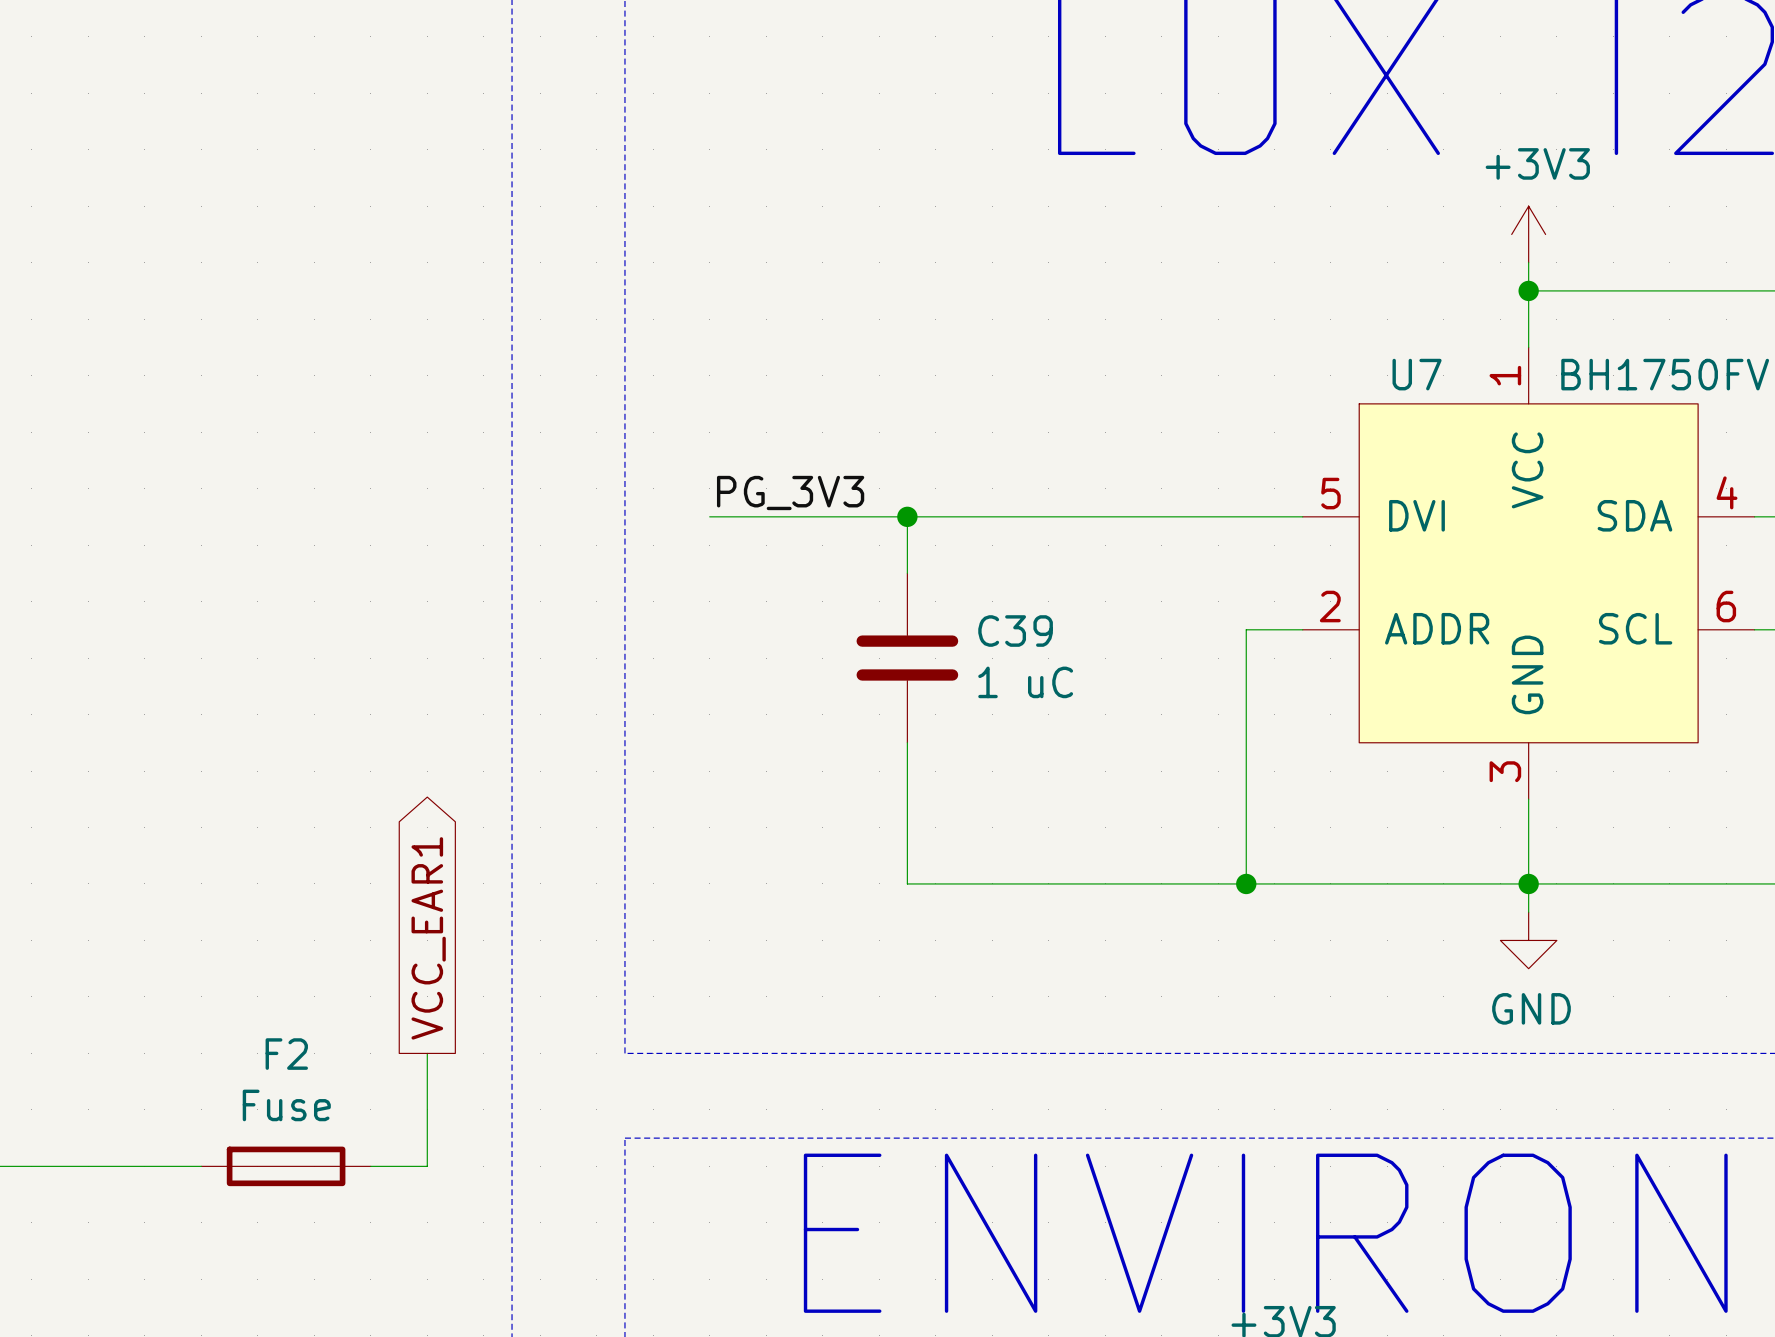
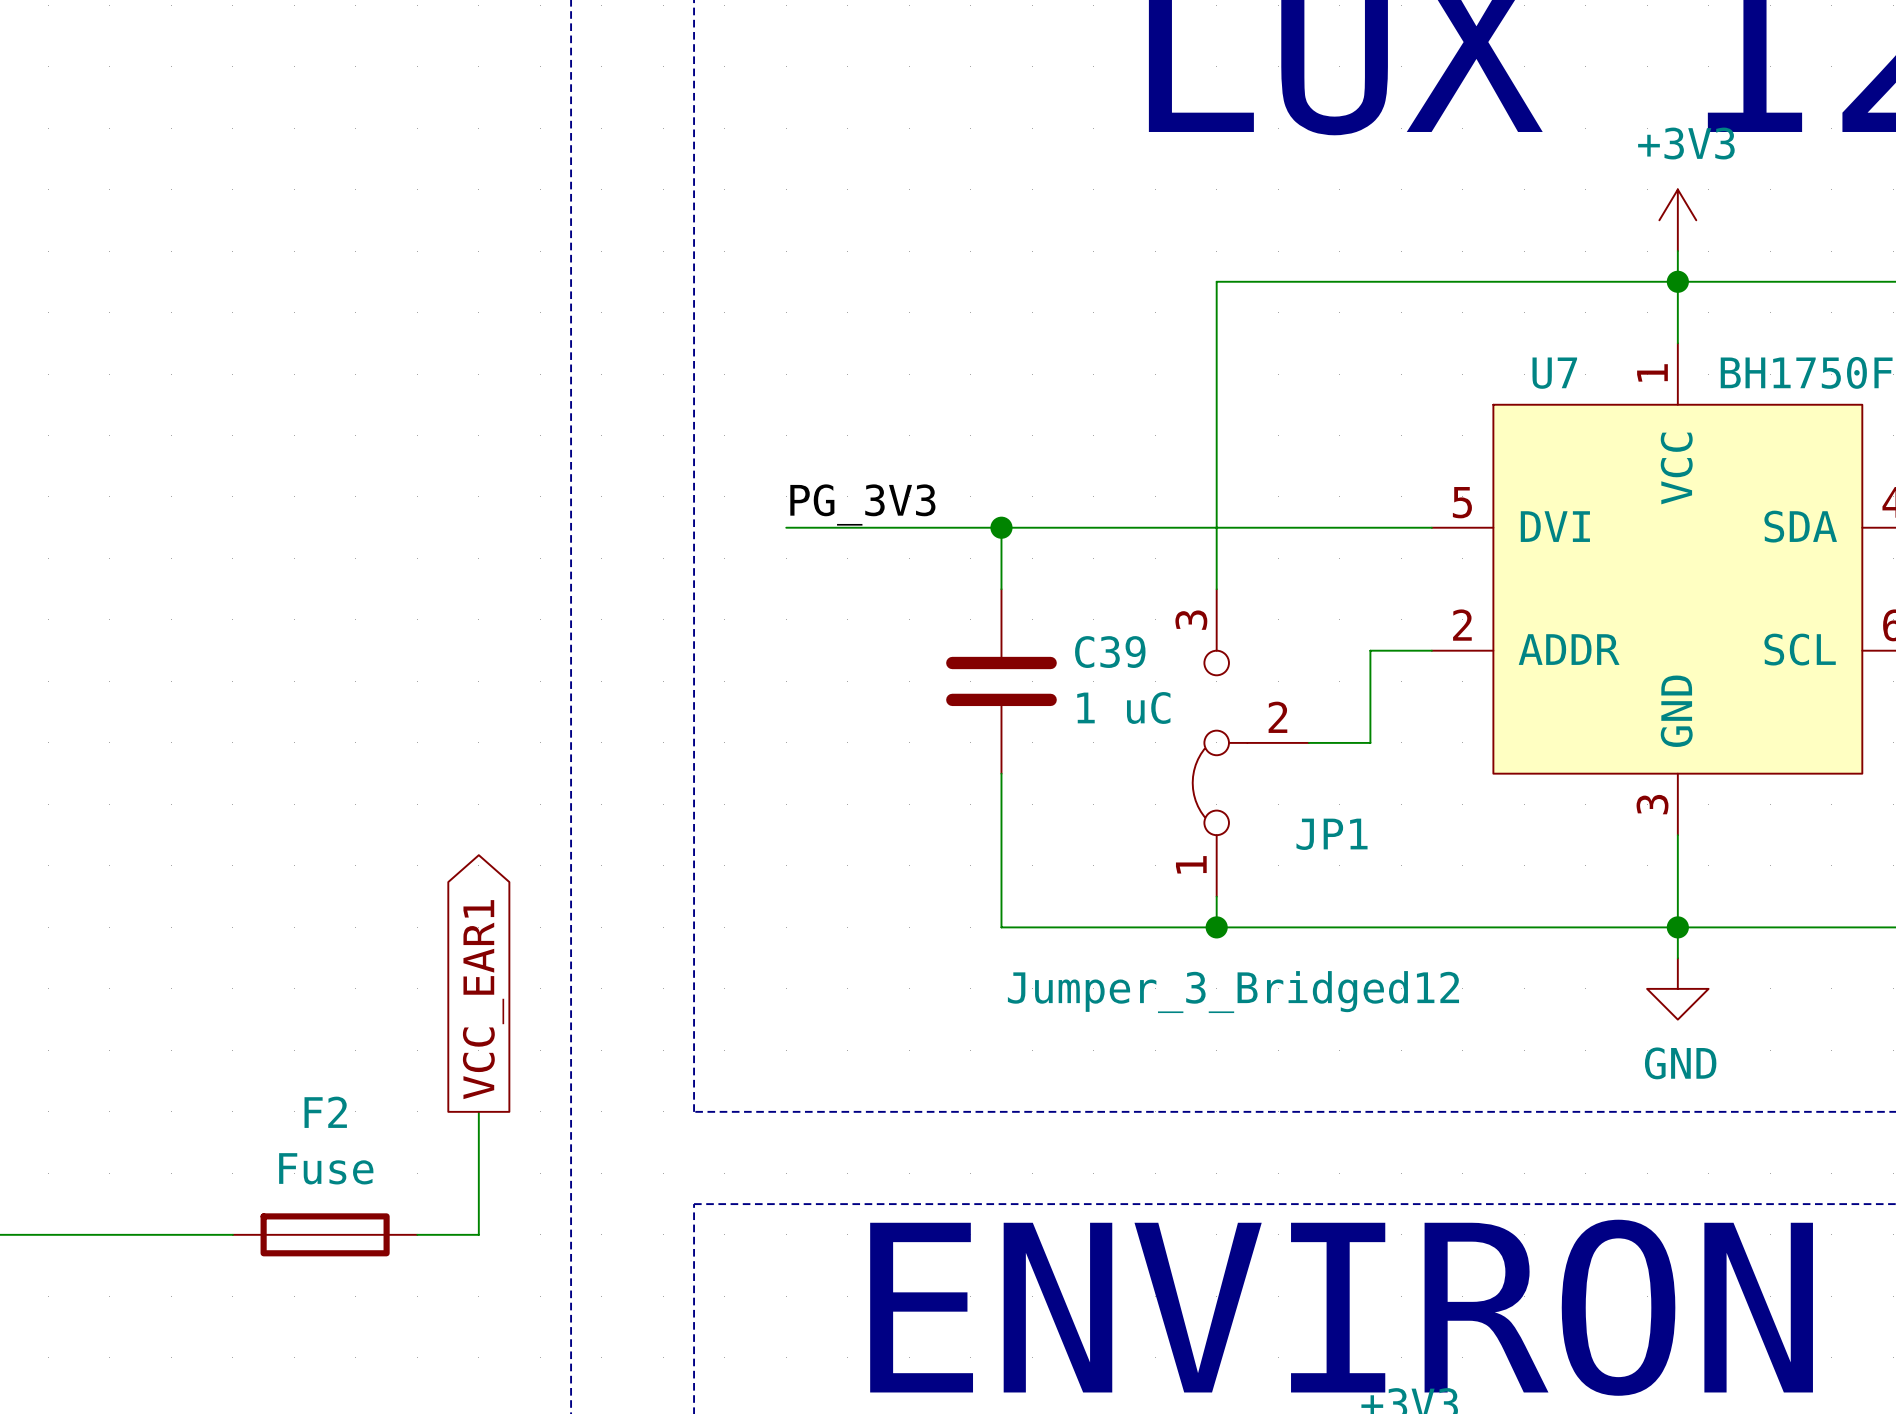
wire: none -> (1677, 281) (1216, 281) (1216, 589)
JP1: none -> Jumper_3_Bridged12 (1250, 742)
wire: (1246, 714) (1246, 883) -> (1370, 742) (1308, 742)
wire: none -> (1216, 896) (1216, 927)
junction: none -> (1216, 927)
junction: (1246, 883) -> none

